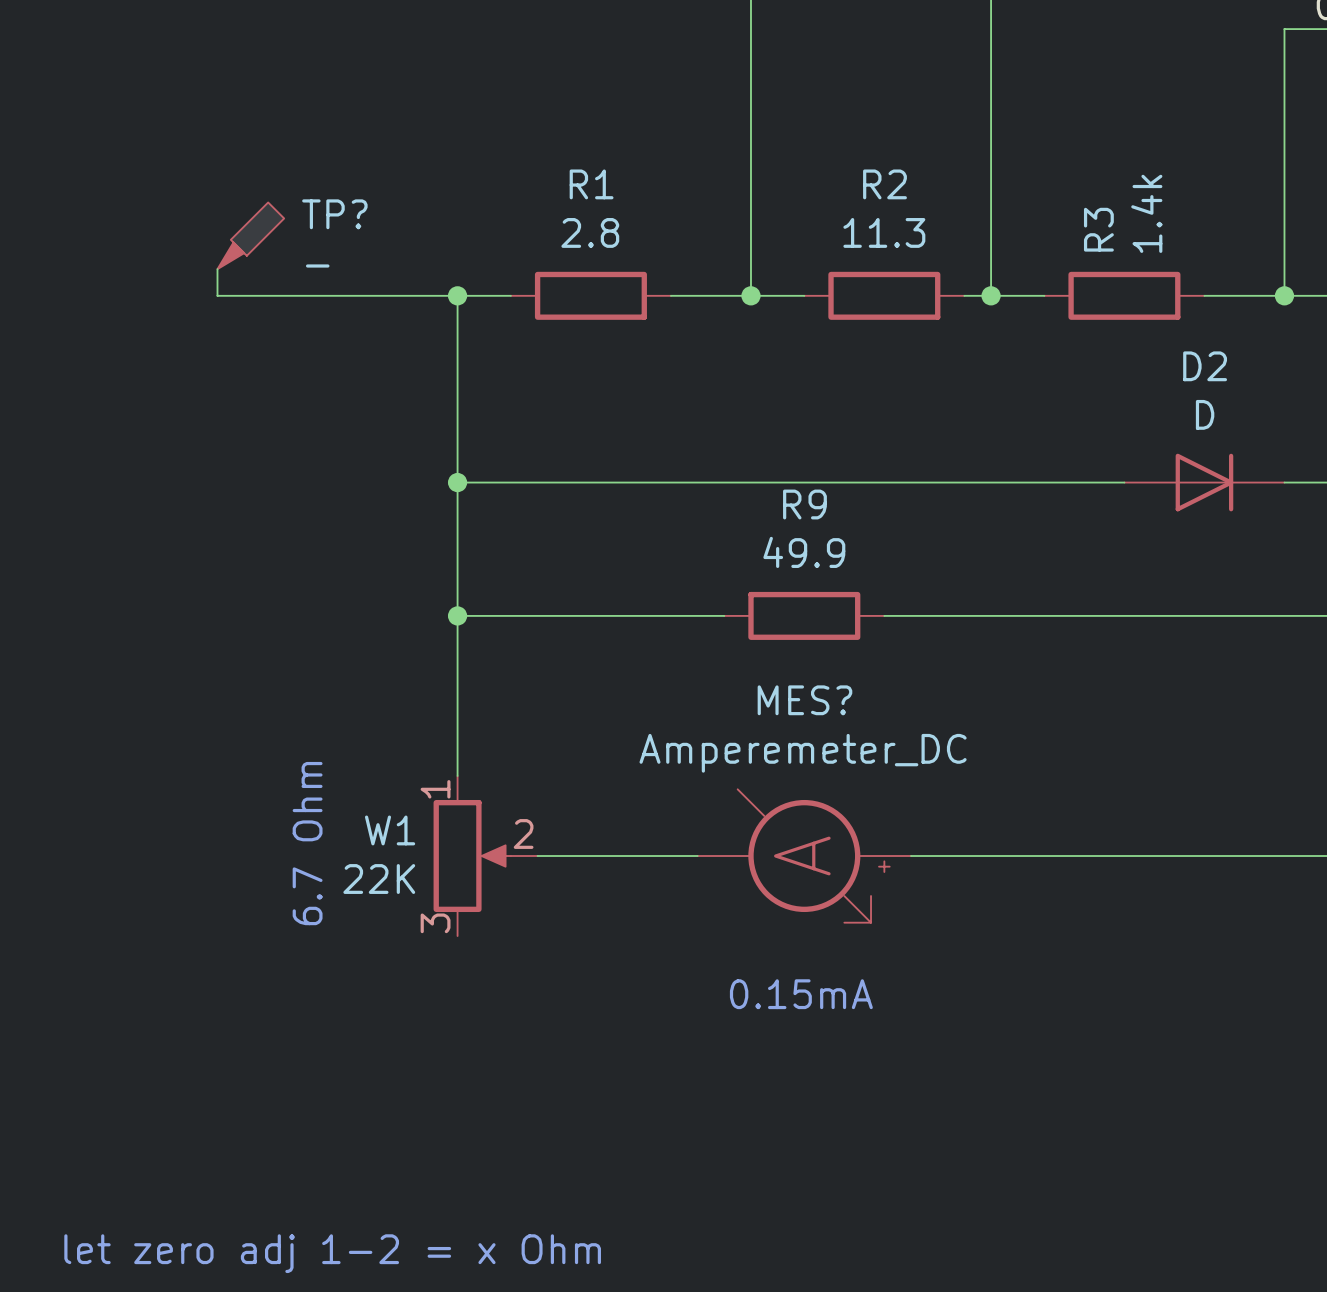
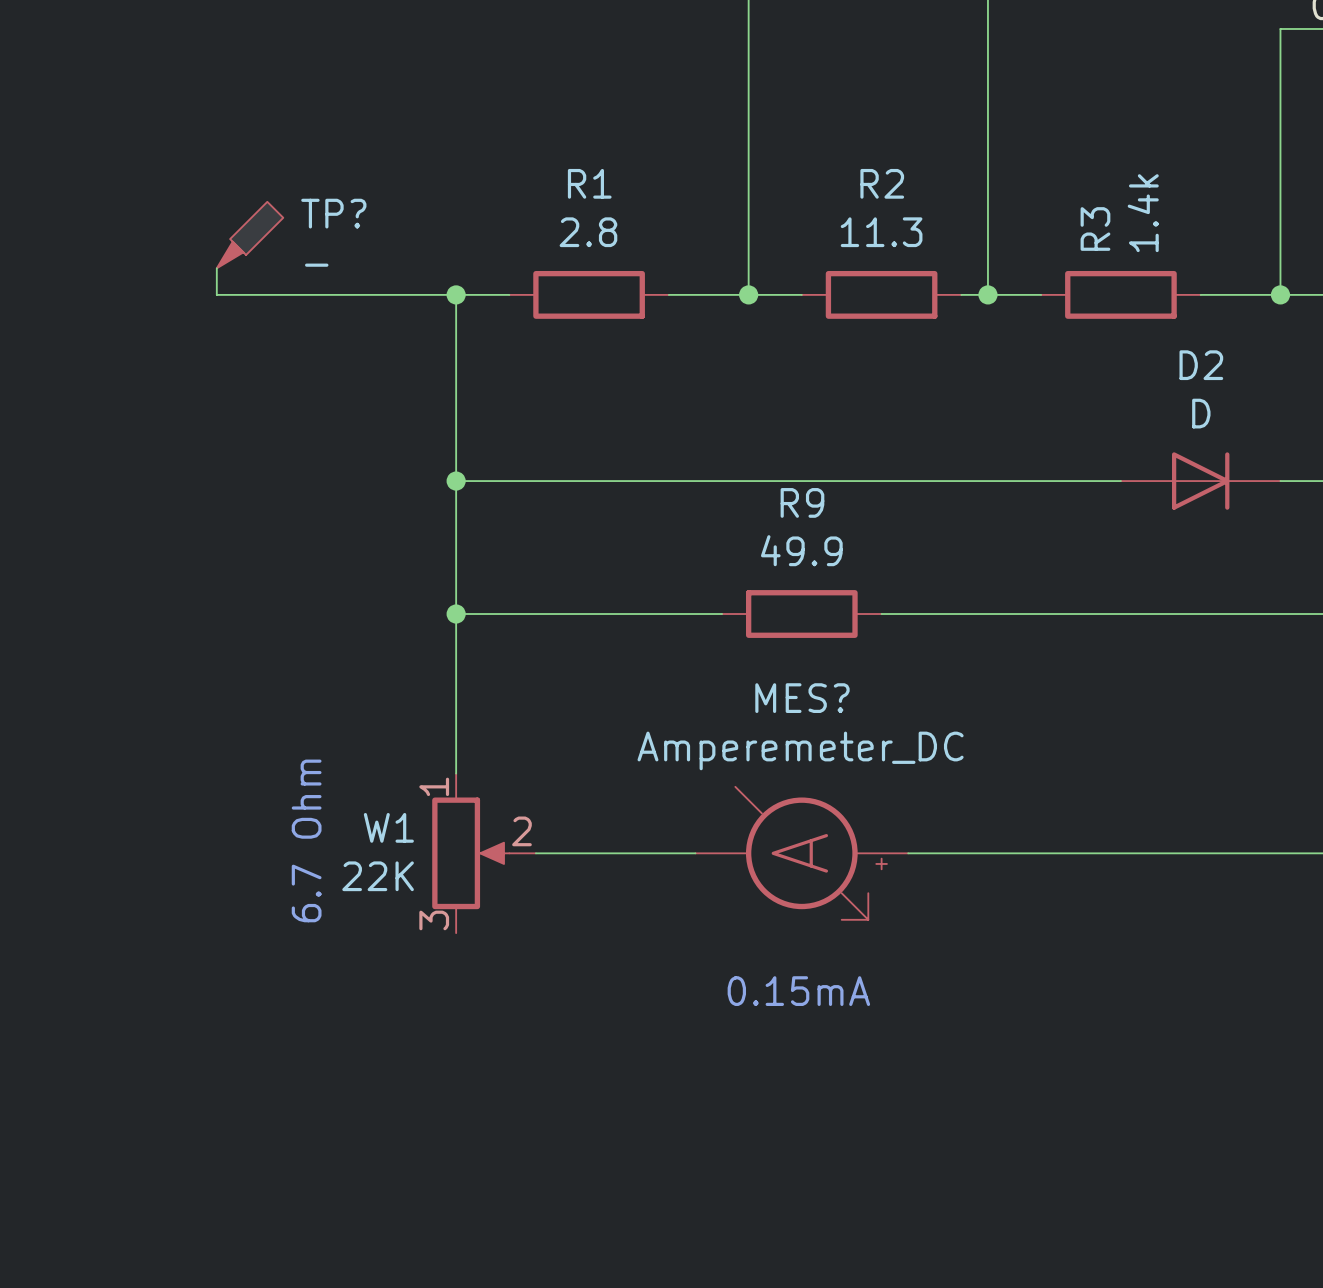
text: let zero adj 1-2 = x Ohm (332, 1253) -> none

